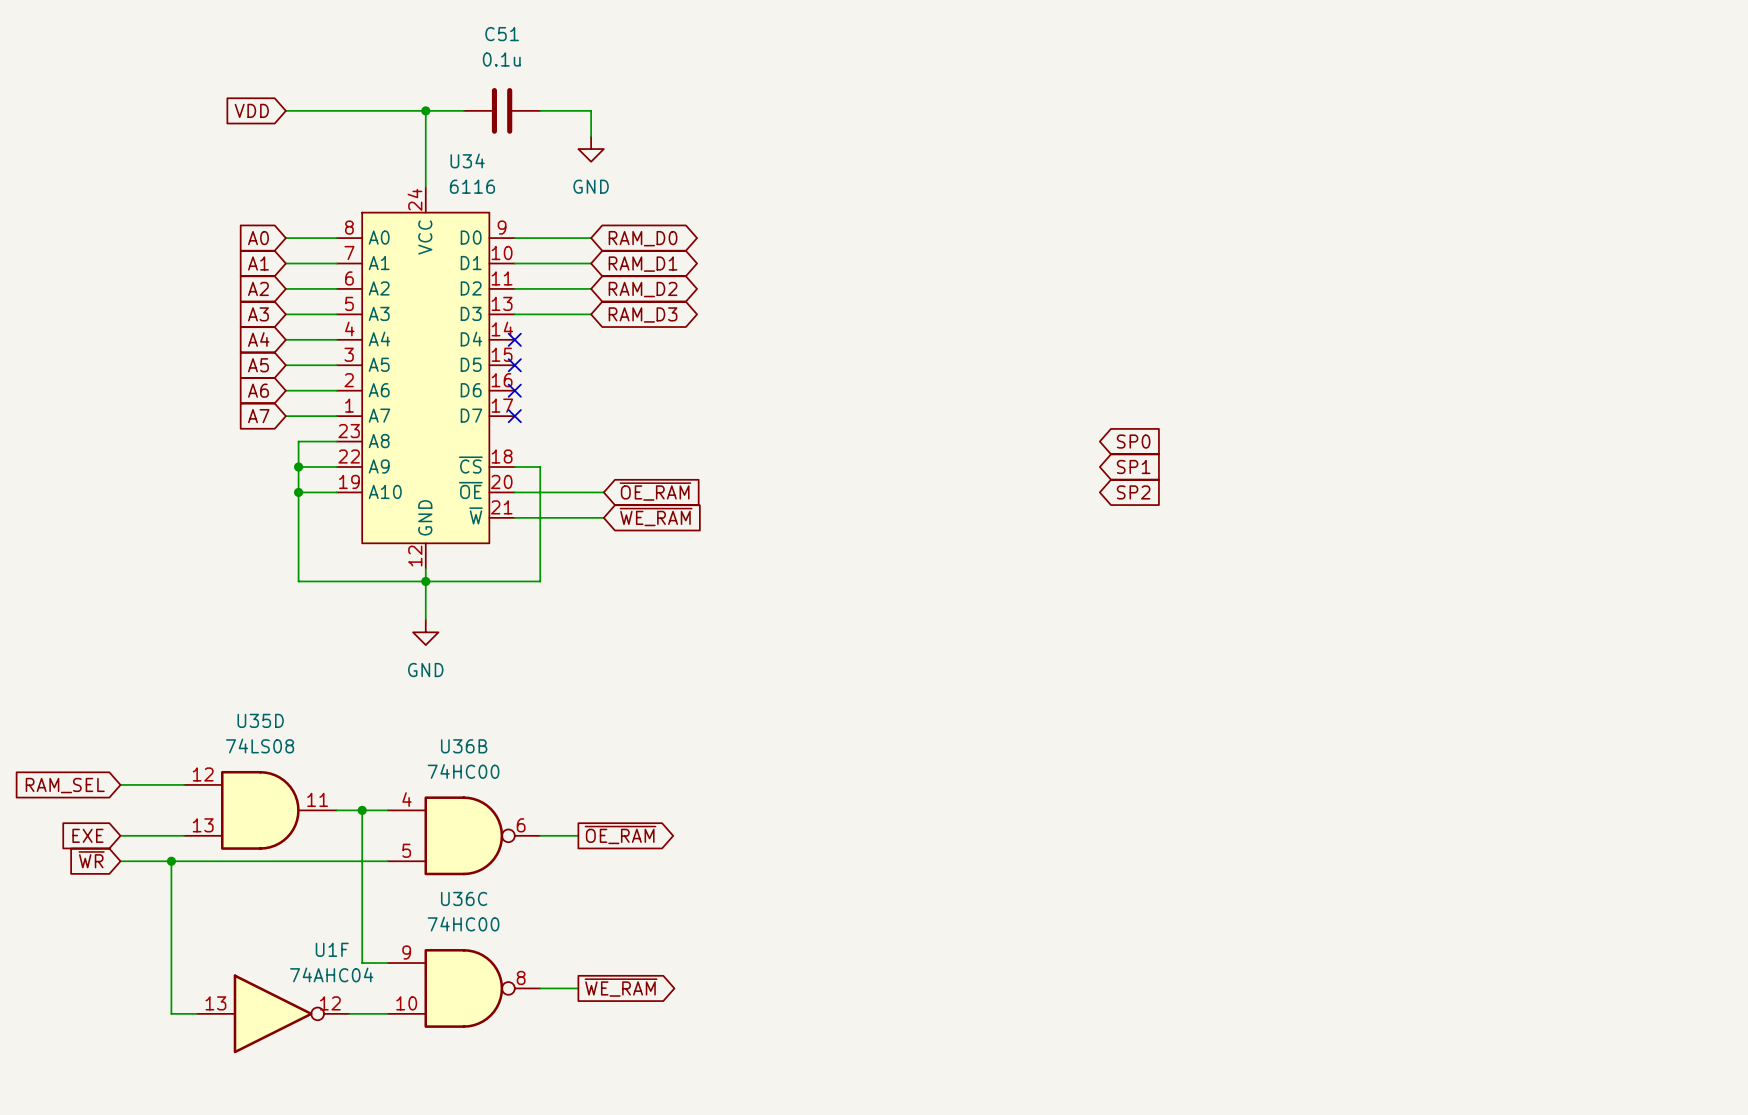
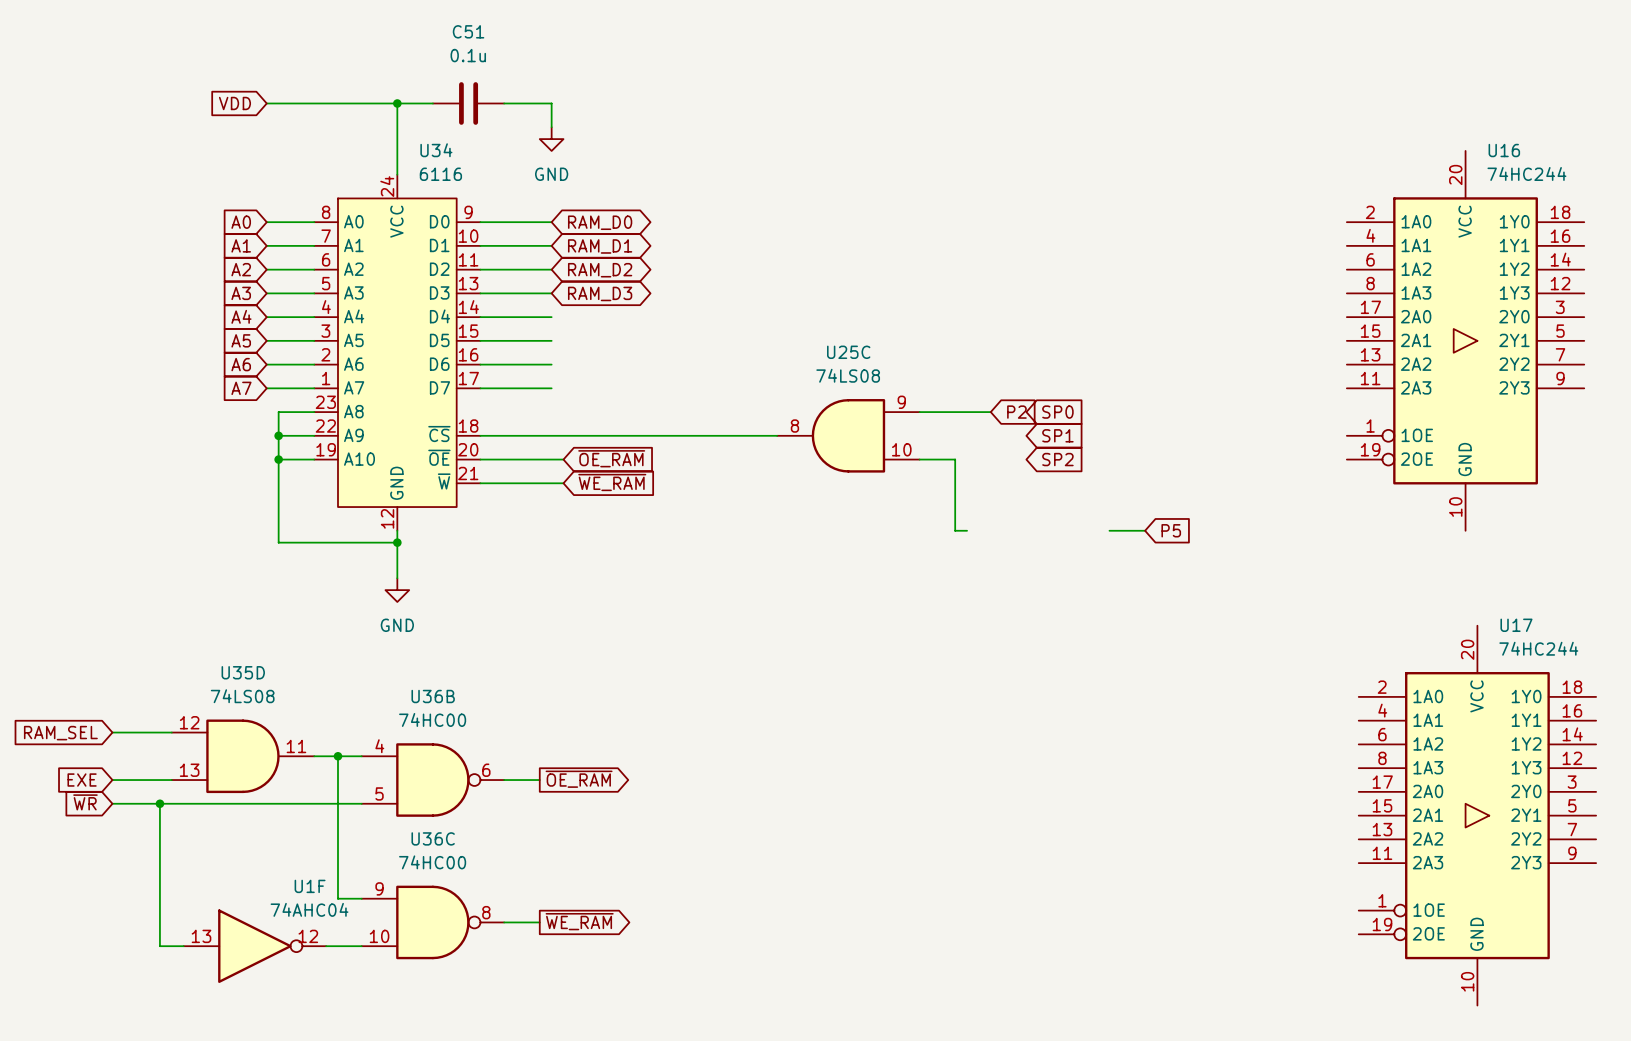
wire: none -> (480, 317) (551, 317)
no-connect mark: (514, 339) -> none
wire: none -> (480, 340) (551, 340)
no-connect mark: (514, 365) -> none
U16: none -> 74HC244 (1465, 340)
wire: none -> (480, 364) (551, 364)
no-connect mark: (514, 390) -> none
wire: none -> (480, 388) (551, 388)
no-connect mark: (514, 416) -> none
wire: none -> (919, 412) (990, 412)
global label: none -> P2 (1016, 412)
wire: (540, 467) (540, 581) (425, 581) -> (504, 435) (777, 435)
U25C: none -> 74LS08 (848, 435)
wire: none -> (919, 459) (955, 459) (955, 530) (967, 530)
wire: none -> (1109, 530) (1145, 530)
global label: none -> P5 (1171, 530)
U17: none -> 74HC244 (1477, 815)

